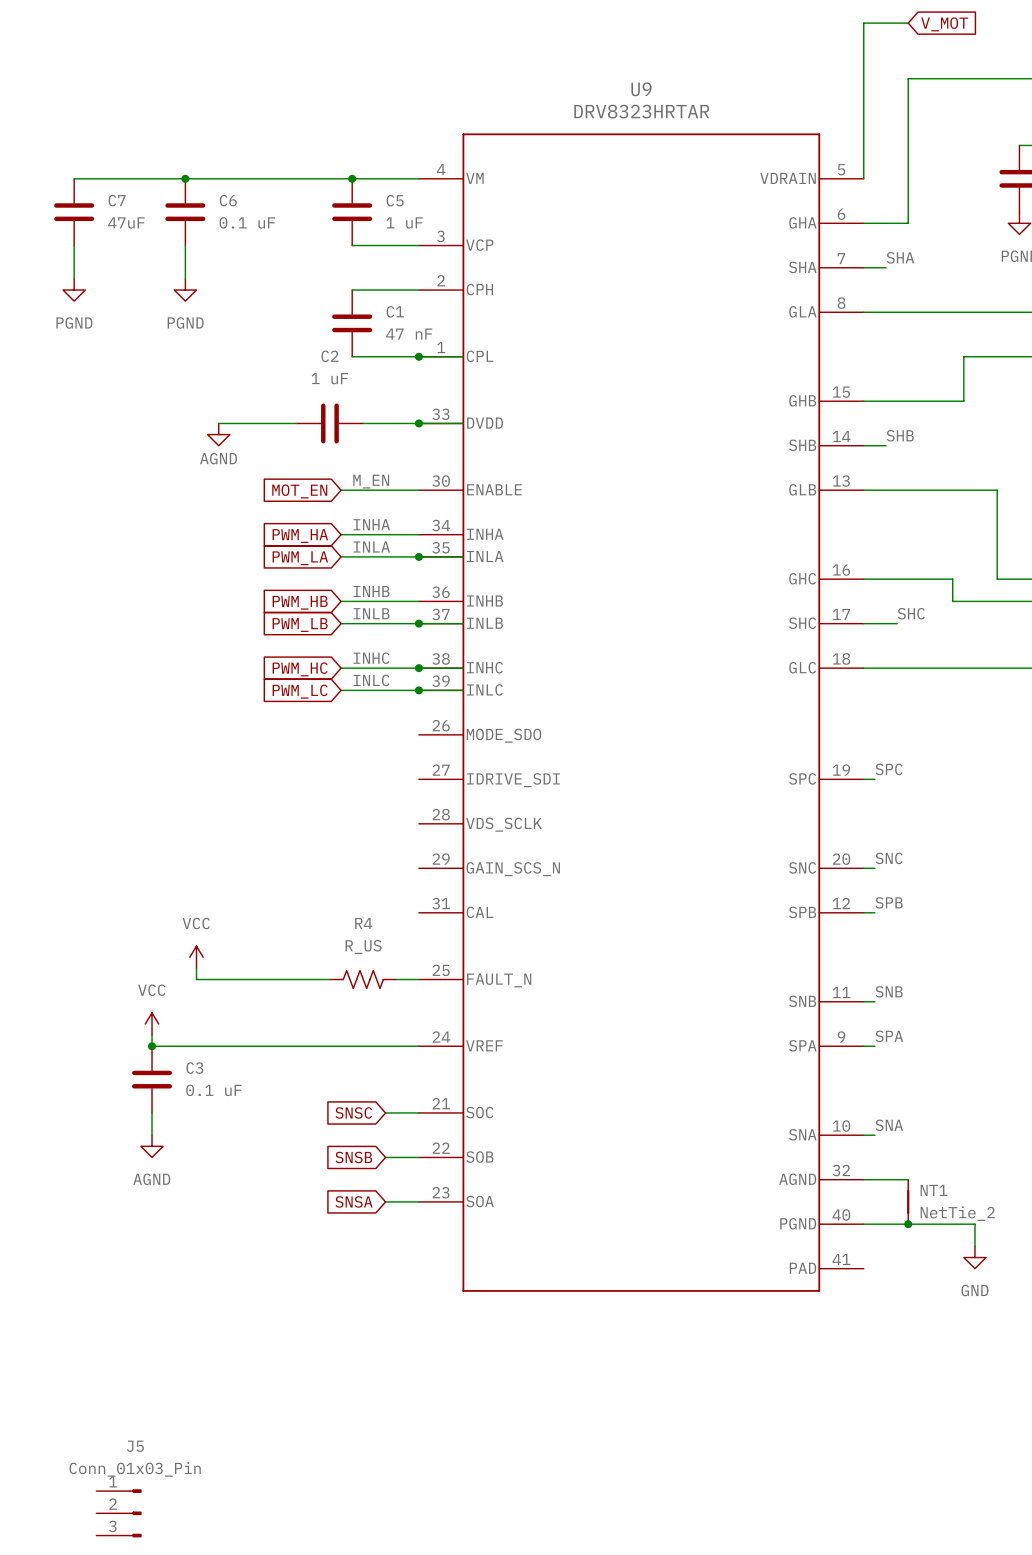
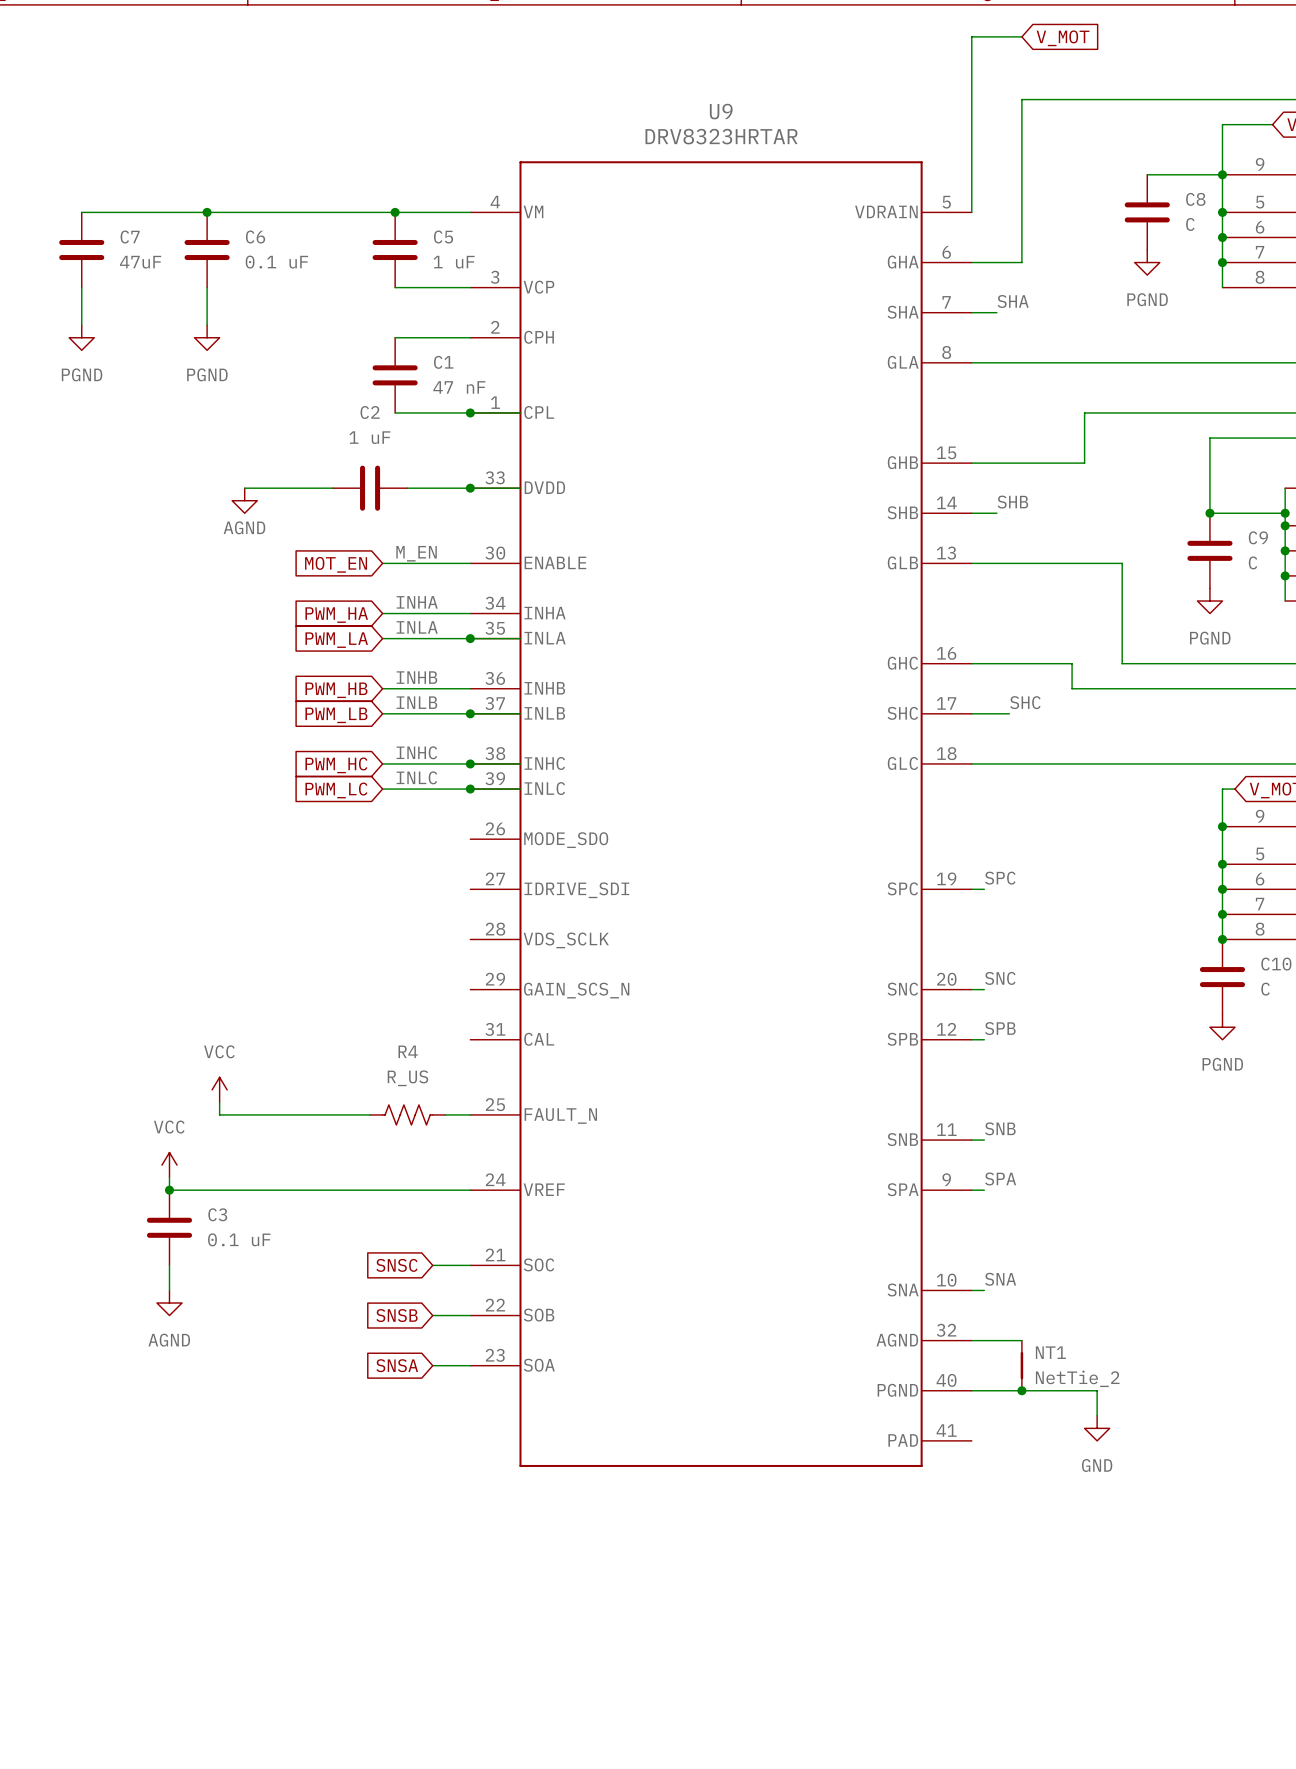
J5: Conn_01x03_Pin (118, 1513) -> none

